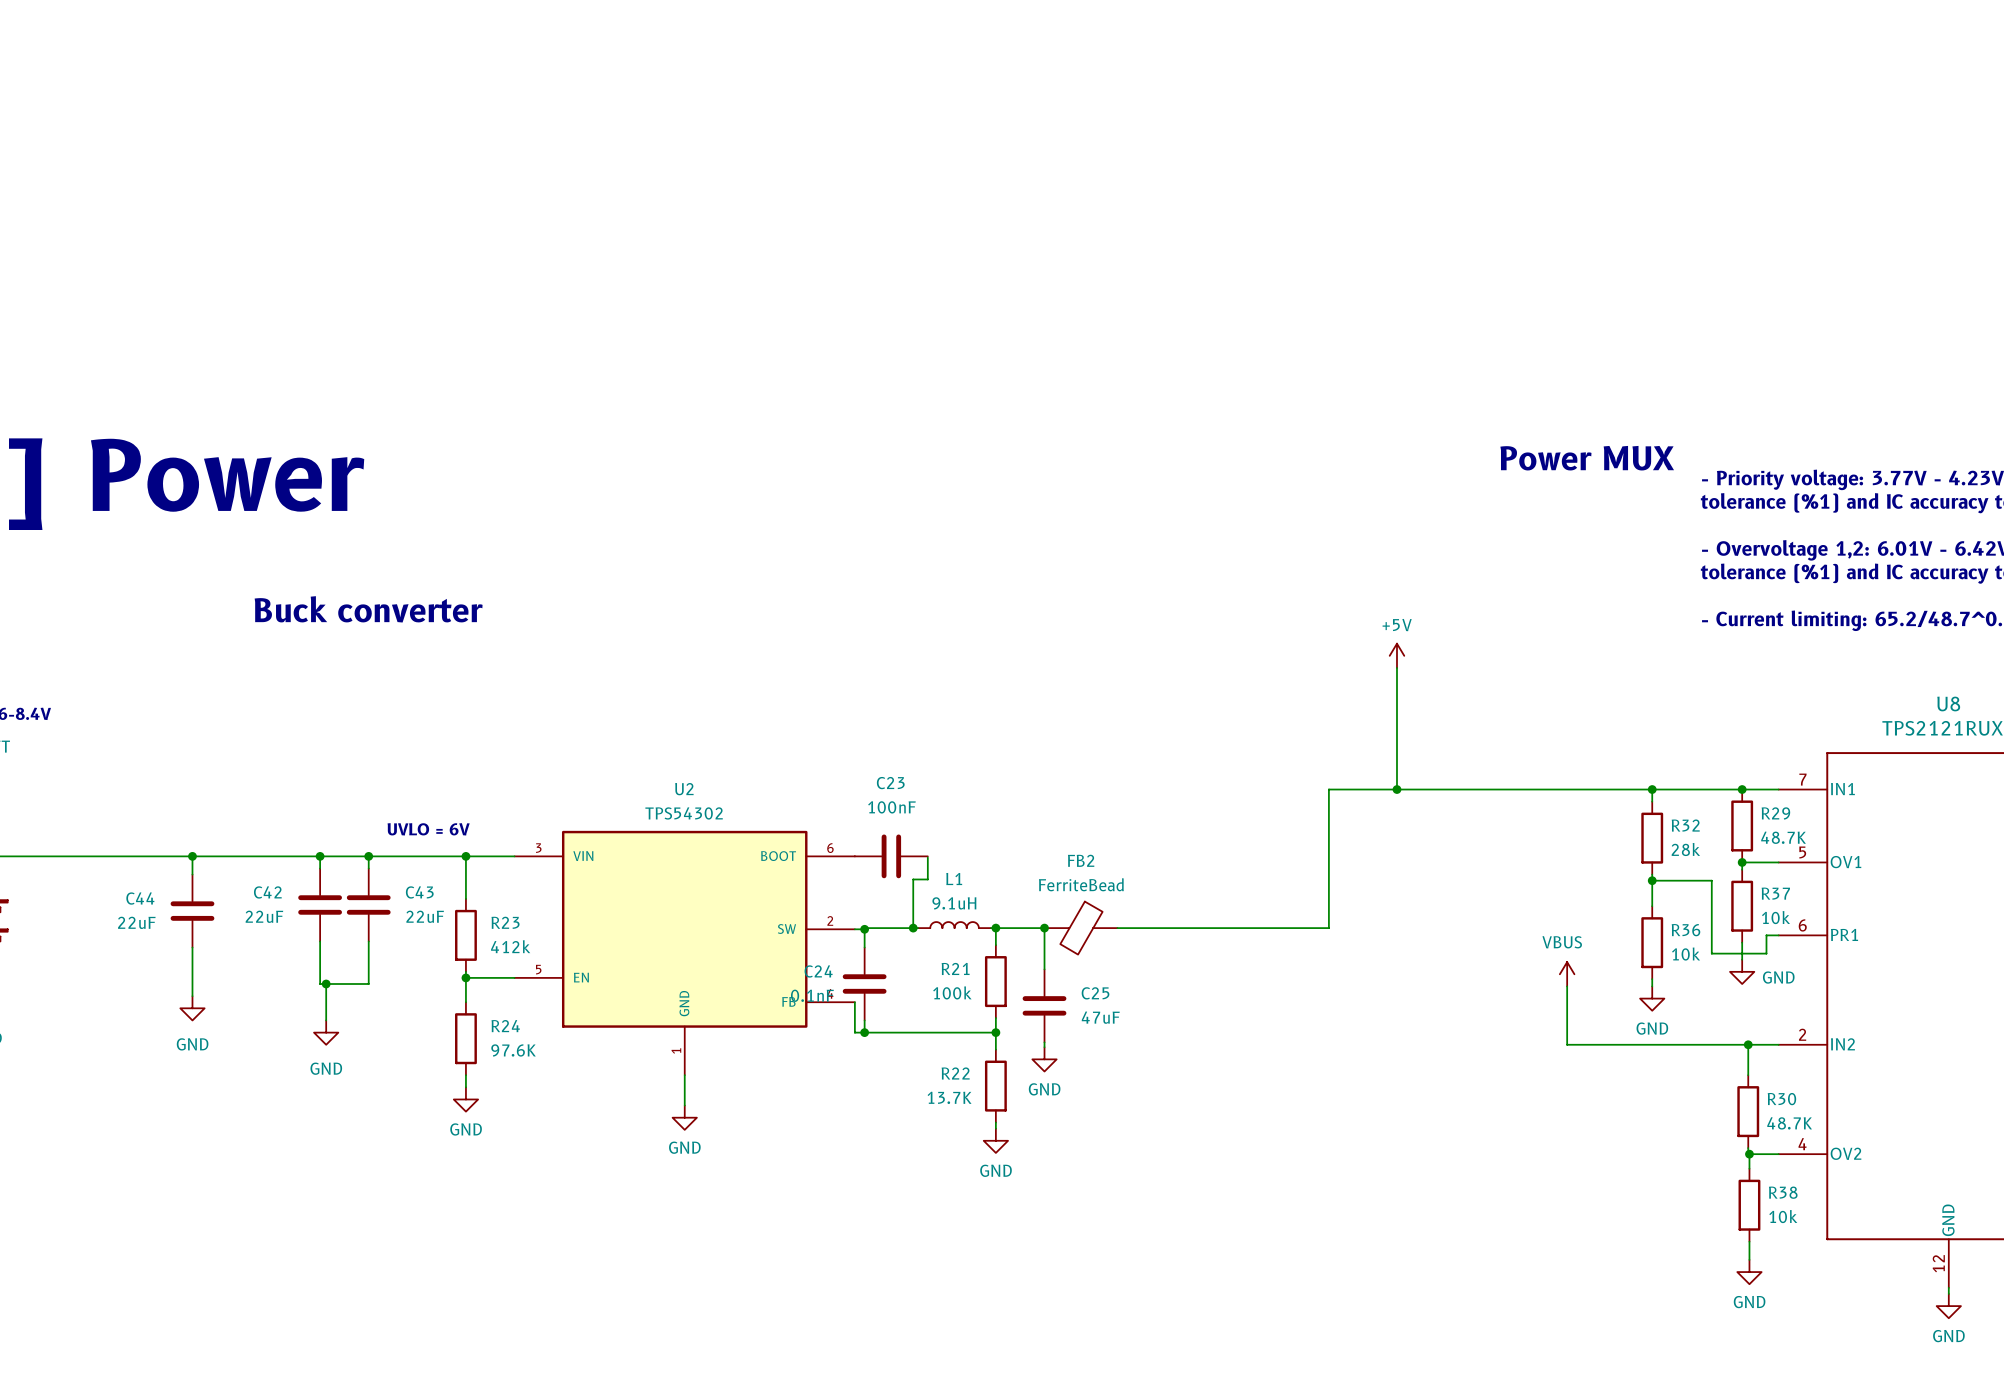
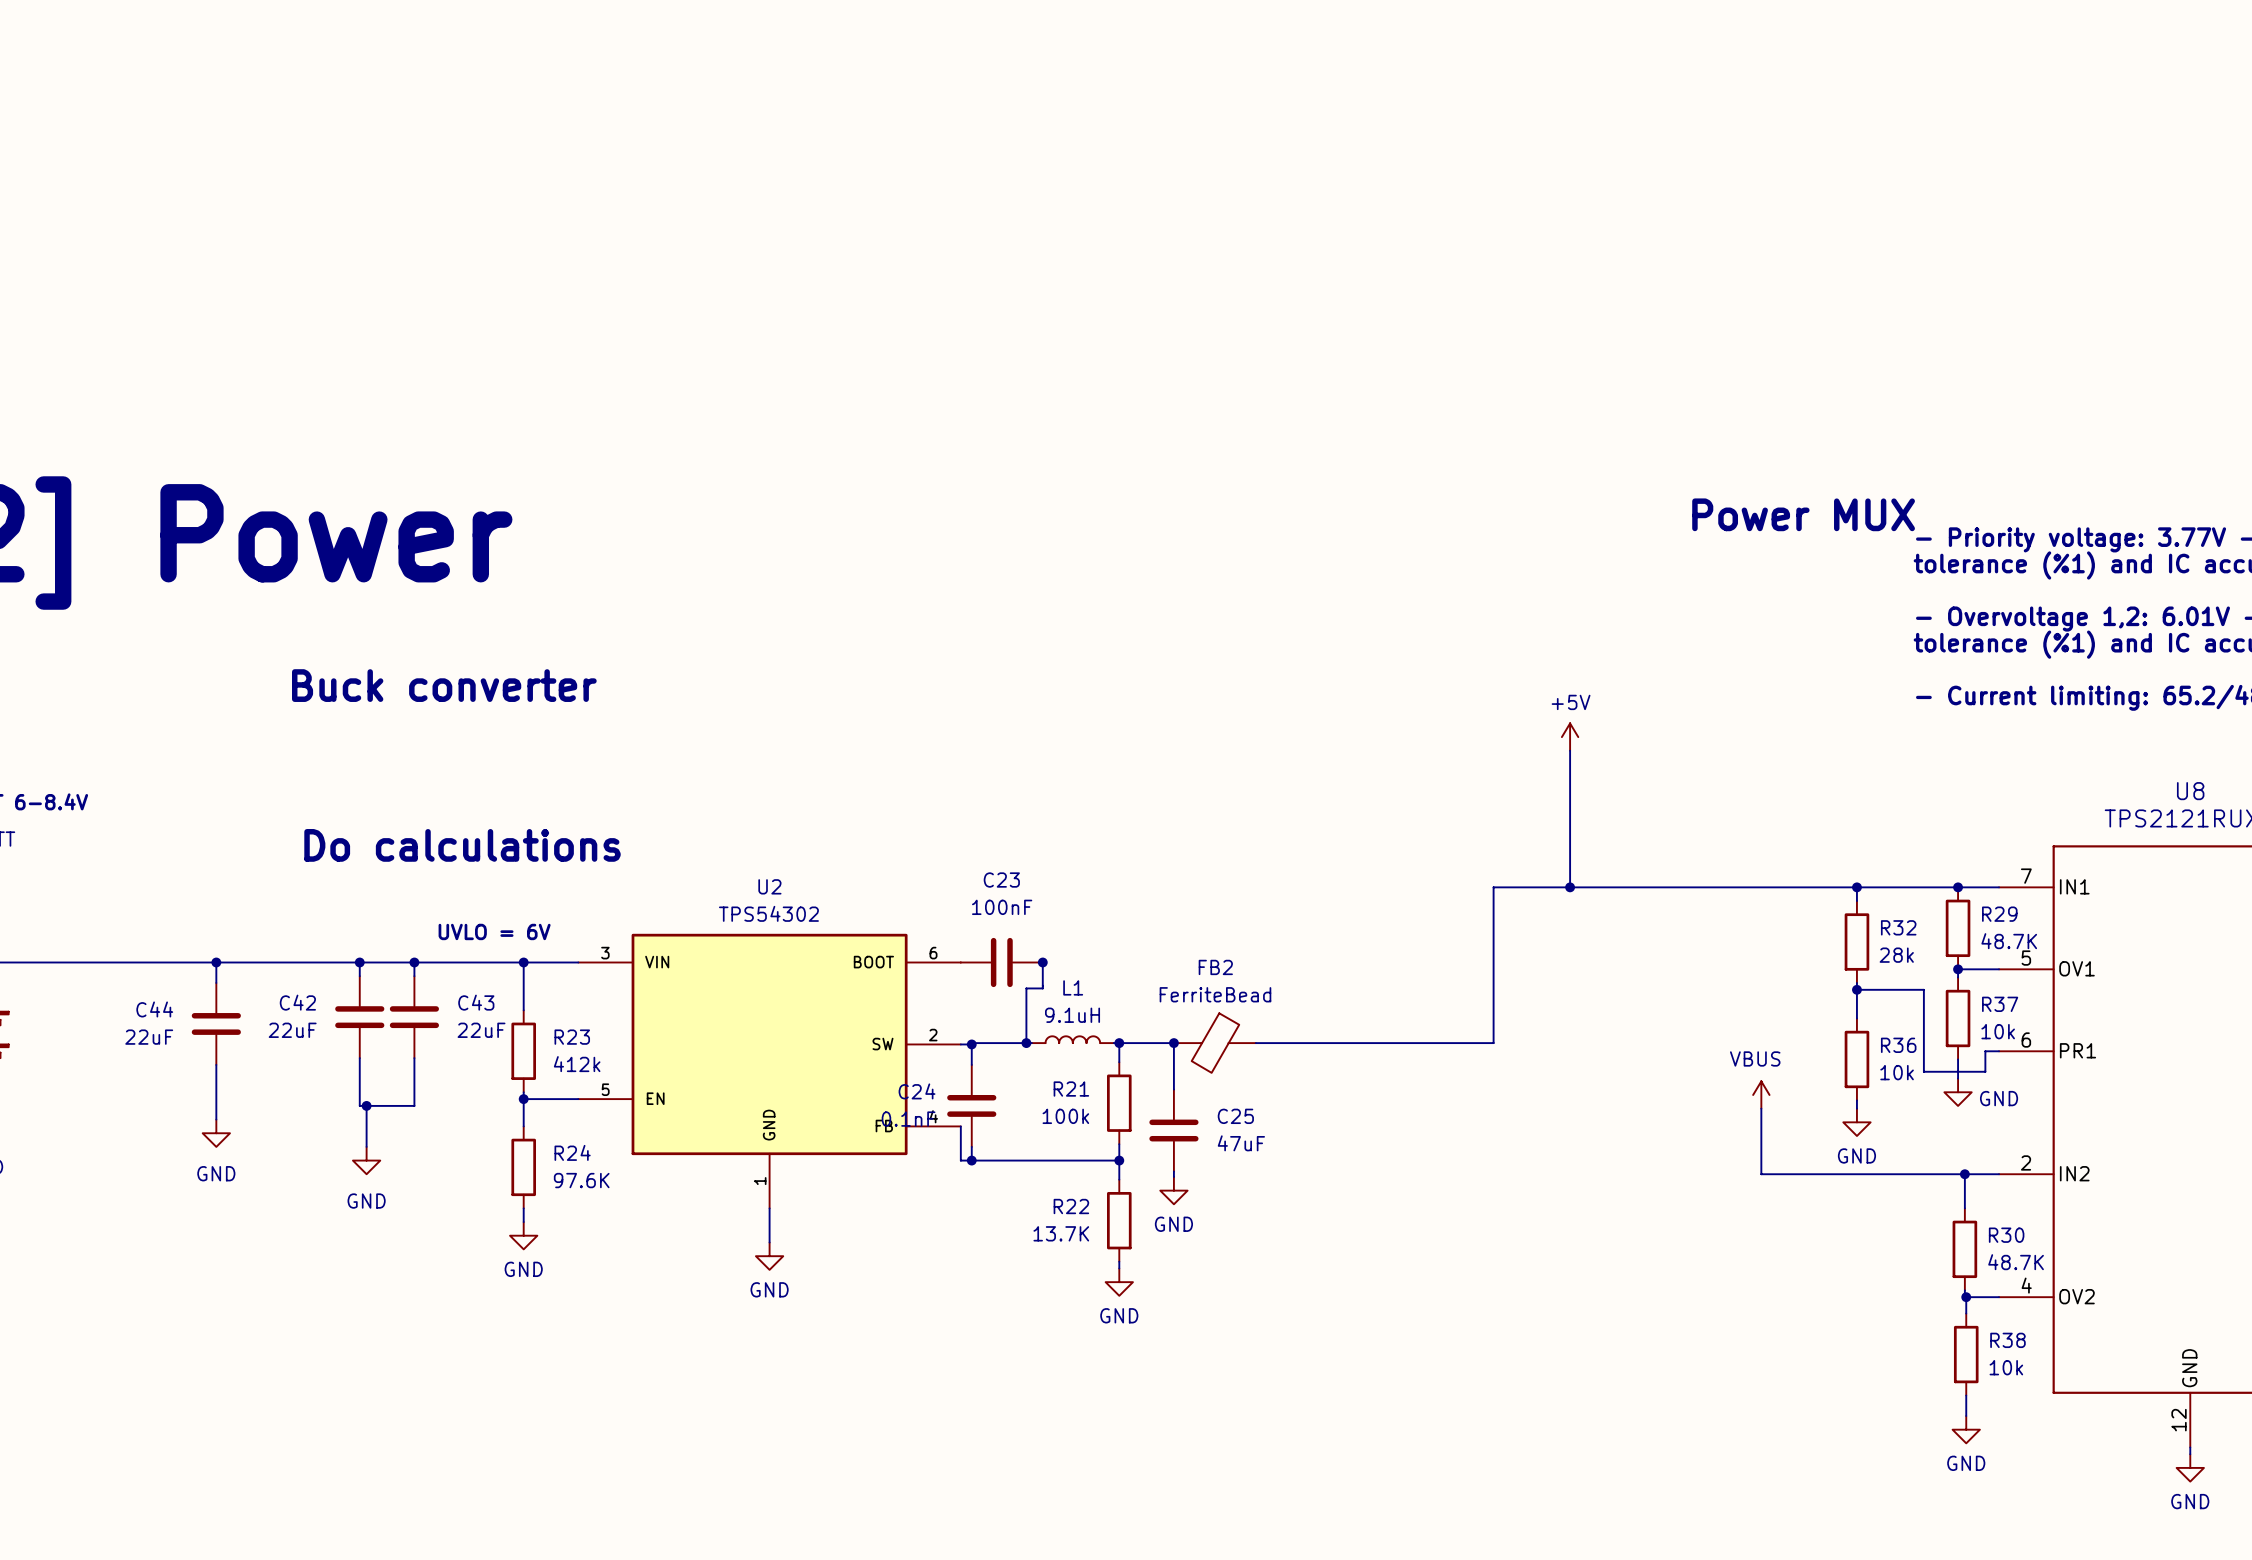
text: none -> Do calculations (462, 845)
junction: none -> (1042, 962)

